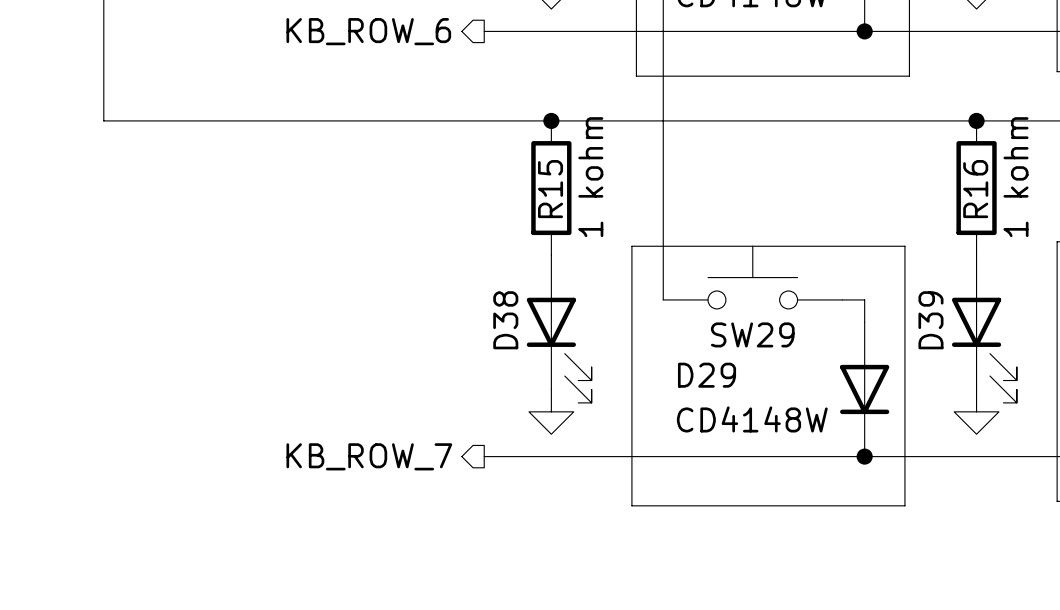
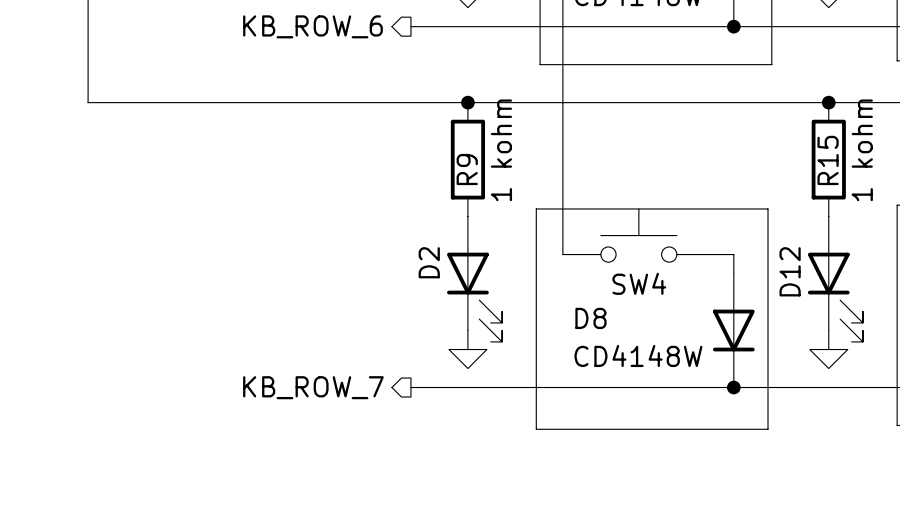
R15 name: R15 (550, 189) -> R9 (467, 169)
R16 name: R16 (975, 189) -> R15 (828, 160)
D38 name: D38 (505, 320) -> D2 (429, 262)
D39 name: D39 (930, 320) -> D12 (790, 271)
SW29 name: SW29 (752, 334) -> SW4 (639, 283)
D29 name: D29 (707, 375) -> D8 (590, 318)

